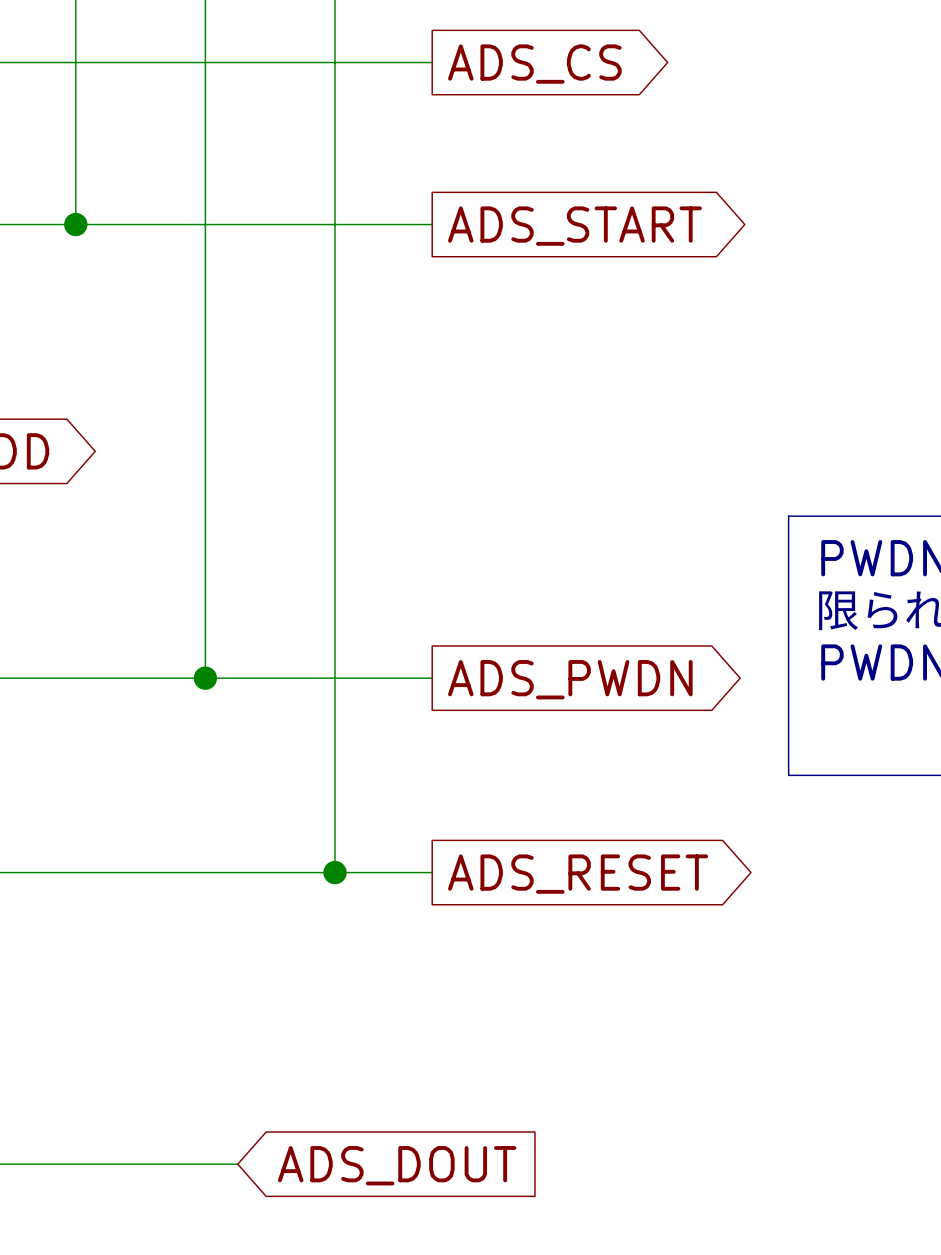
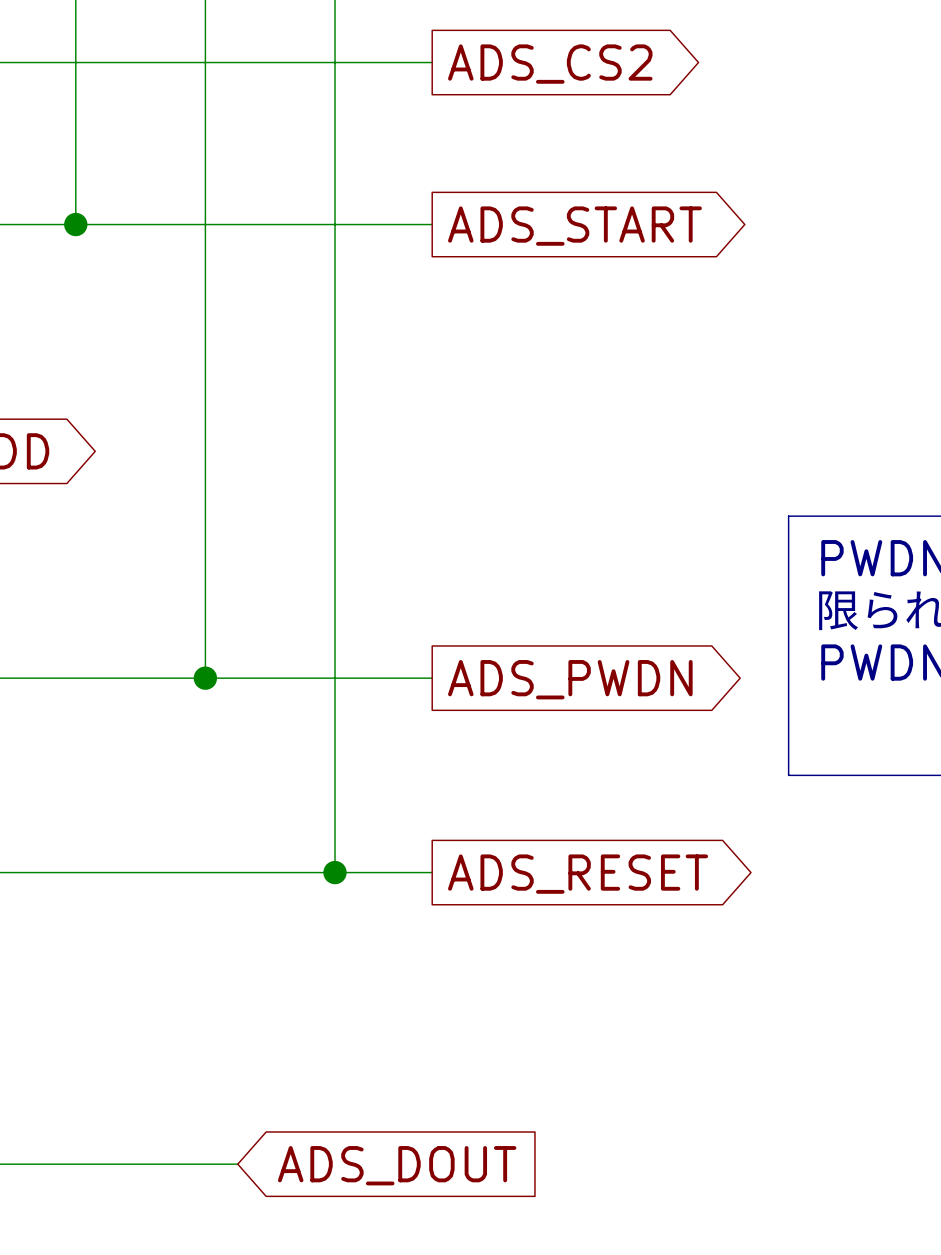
global label: ADS_CS (534, 64) -> ADS_CS2 (550, 64)

